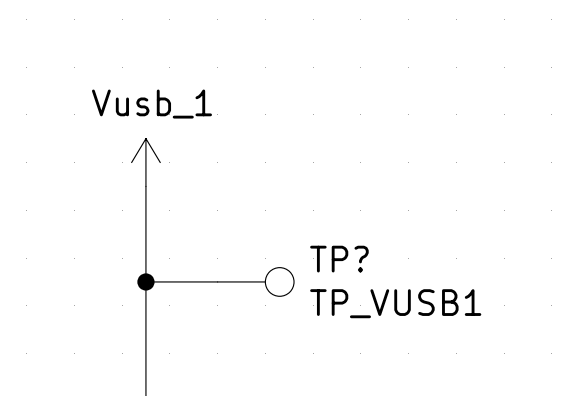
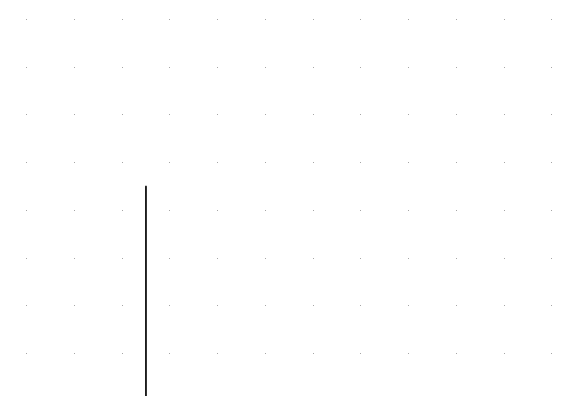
power symbol: Vusb_1 (145, 162) -> none
wire: (145, 281) (217, 281) -> none
junction: (145, 281) -> none
TP?: TP_VUSB1 (255, 281) -> none

